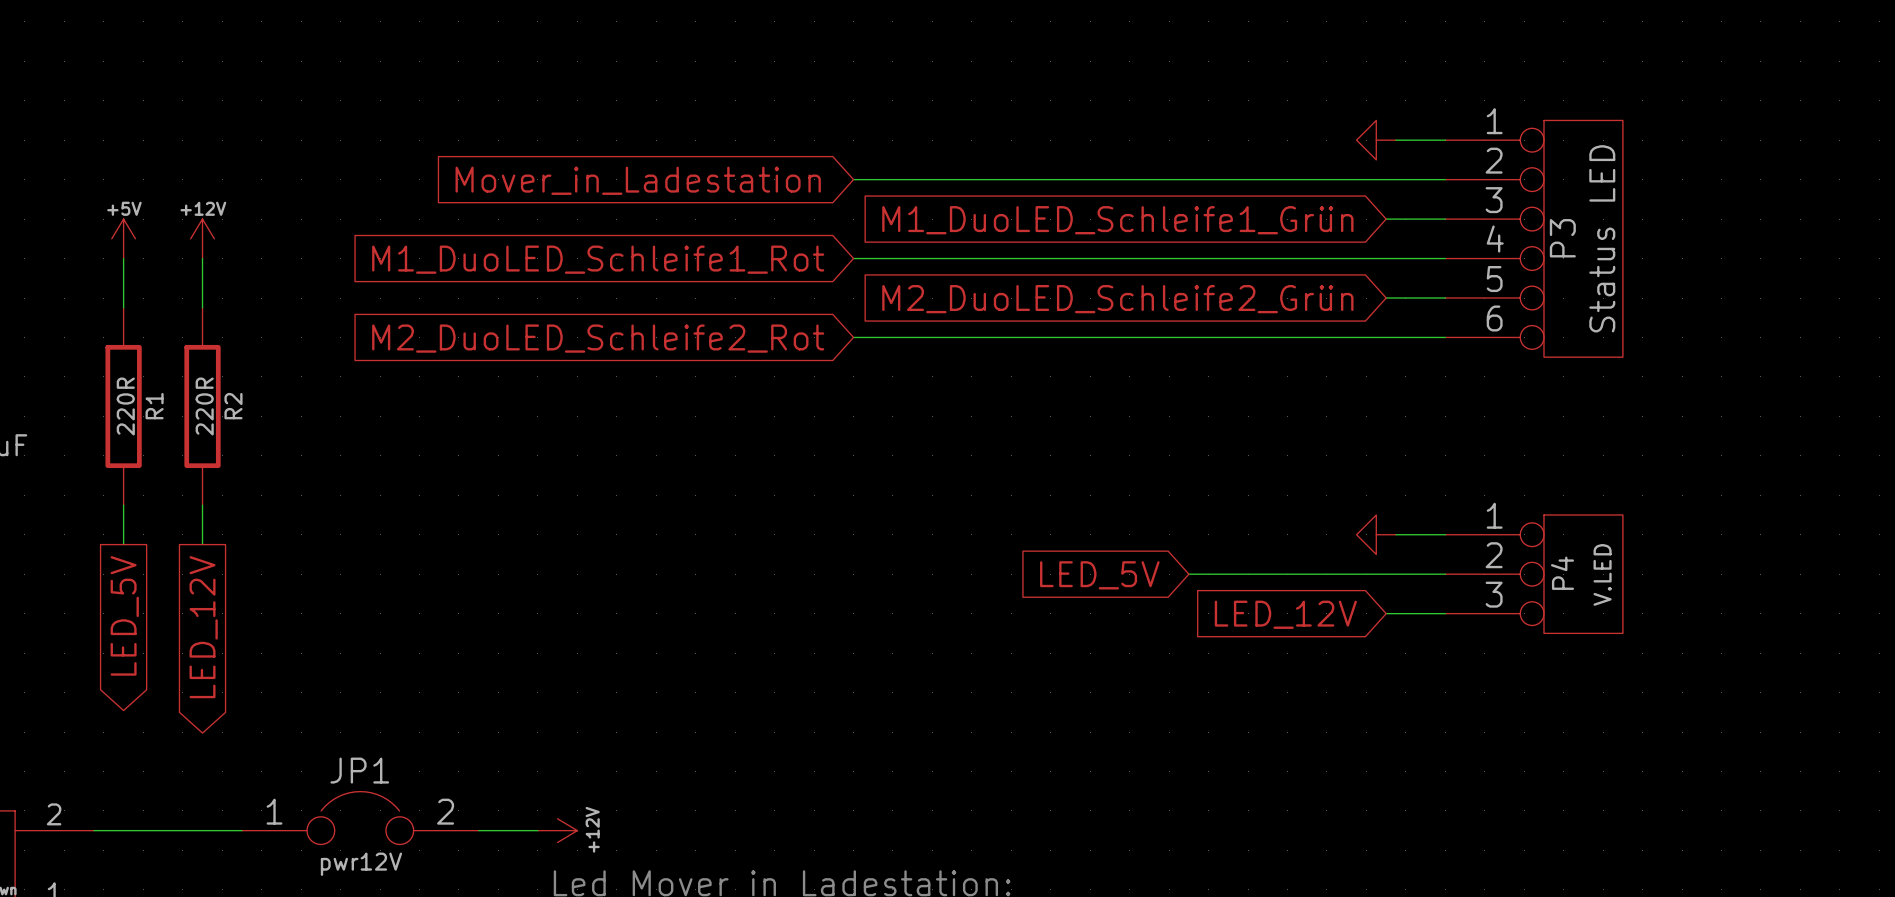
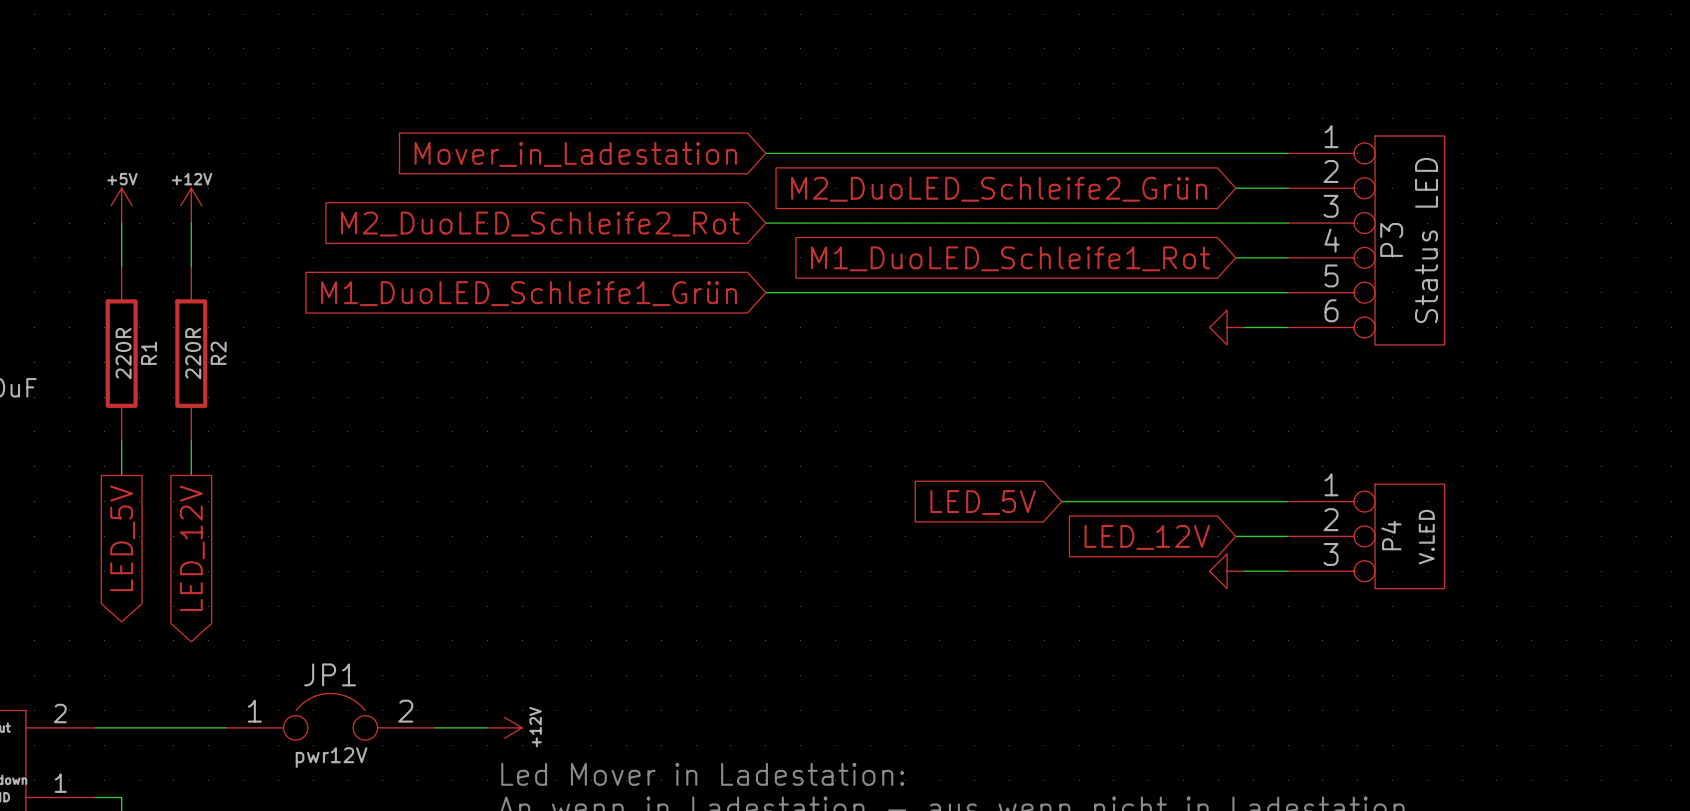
power symbol: (1376, 140) -> none
wire: (1396, 140) (1445, 140) -> (1244, 327) (1288, 327)
global label: M1_DuoLED_Schleife1_Grün (1117, 220) -> M2_DuoLED_Schleife2_Grün (999, 189)
P3 position: (1534, 238) -> (1366, 240)
global label: M1_DuoLED_Schleife1_Rot (598, 259) -> M2_DuoLED_Schleife2_Rot (540, 224)
global label: M2_DuoLED_Schleife2_Grün (1117, 299) -> M1_DuoLED_Schleife1_Rot (1010, 258)
global label: M2_DuoLED_Schleife2_Rot (598, 338) -> M1_DuoLED_Schleife1_Grün (529, 293)
power symbol: none -> (1227, 327)
power symbol: (1376, 534) -> none
wire: (1396, 534) (1445, 534) -> (1244, 571) (1288, 571)
P4 position: (1534, 574) -> (1366, 536)
power symbol: none -> (1227, 571)

